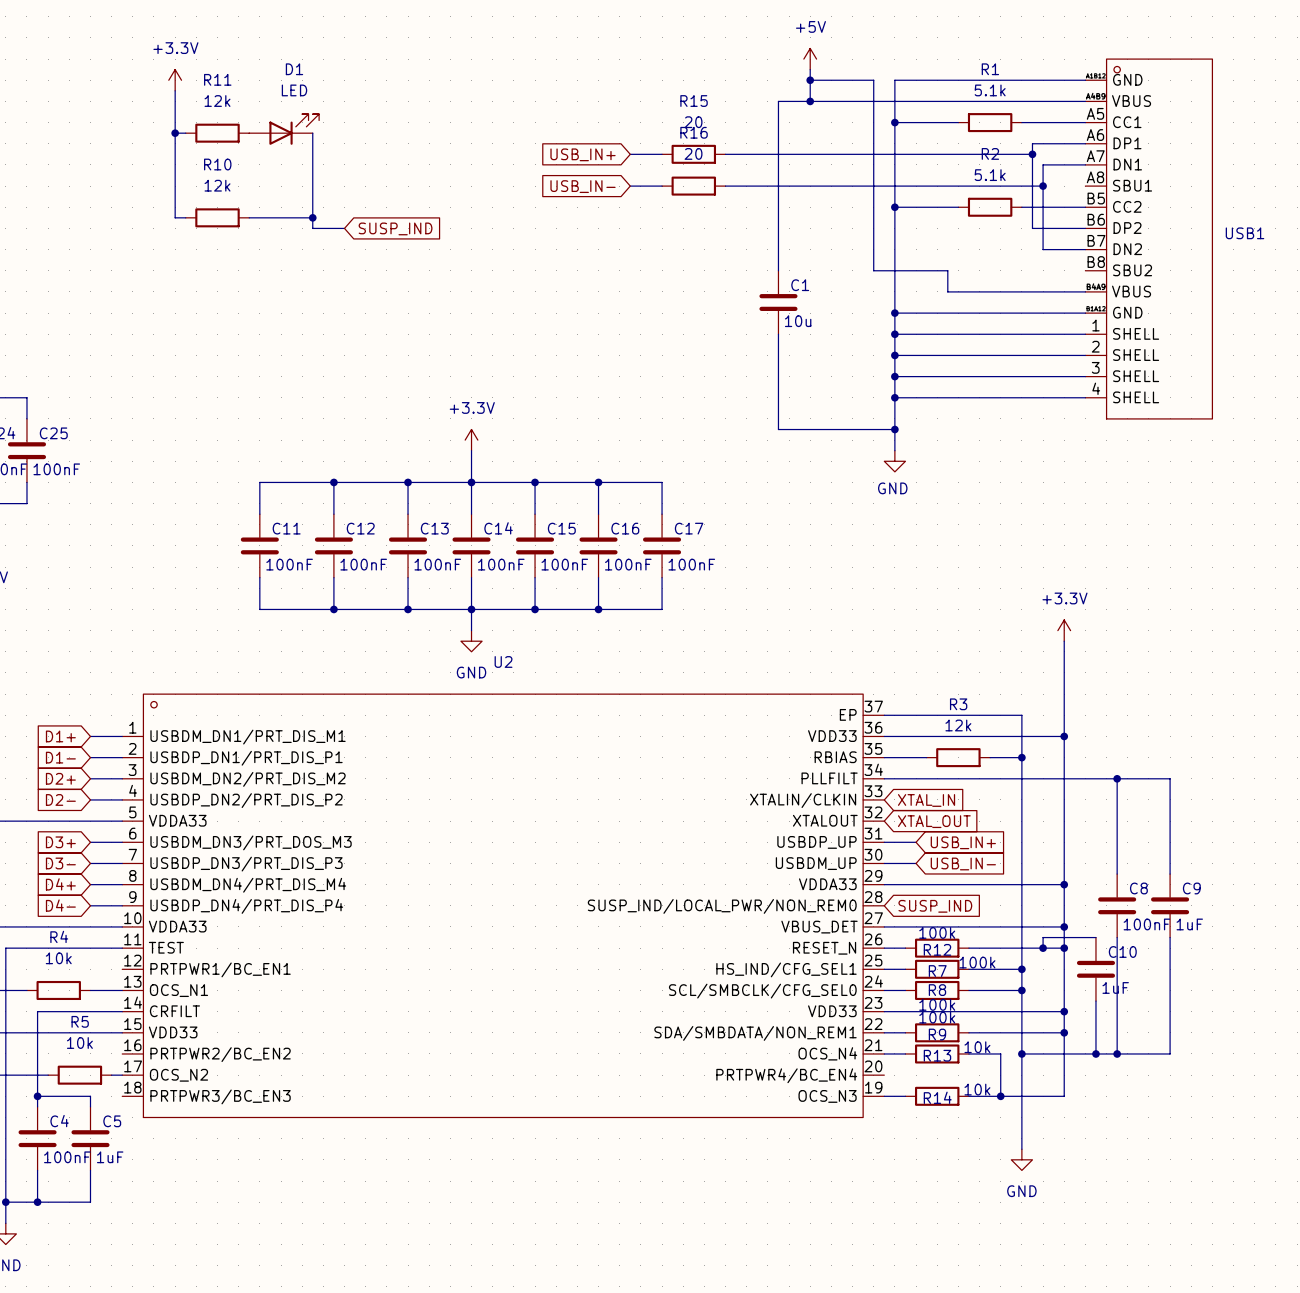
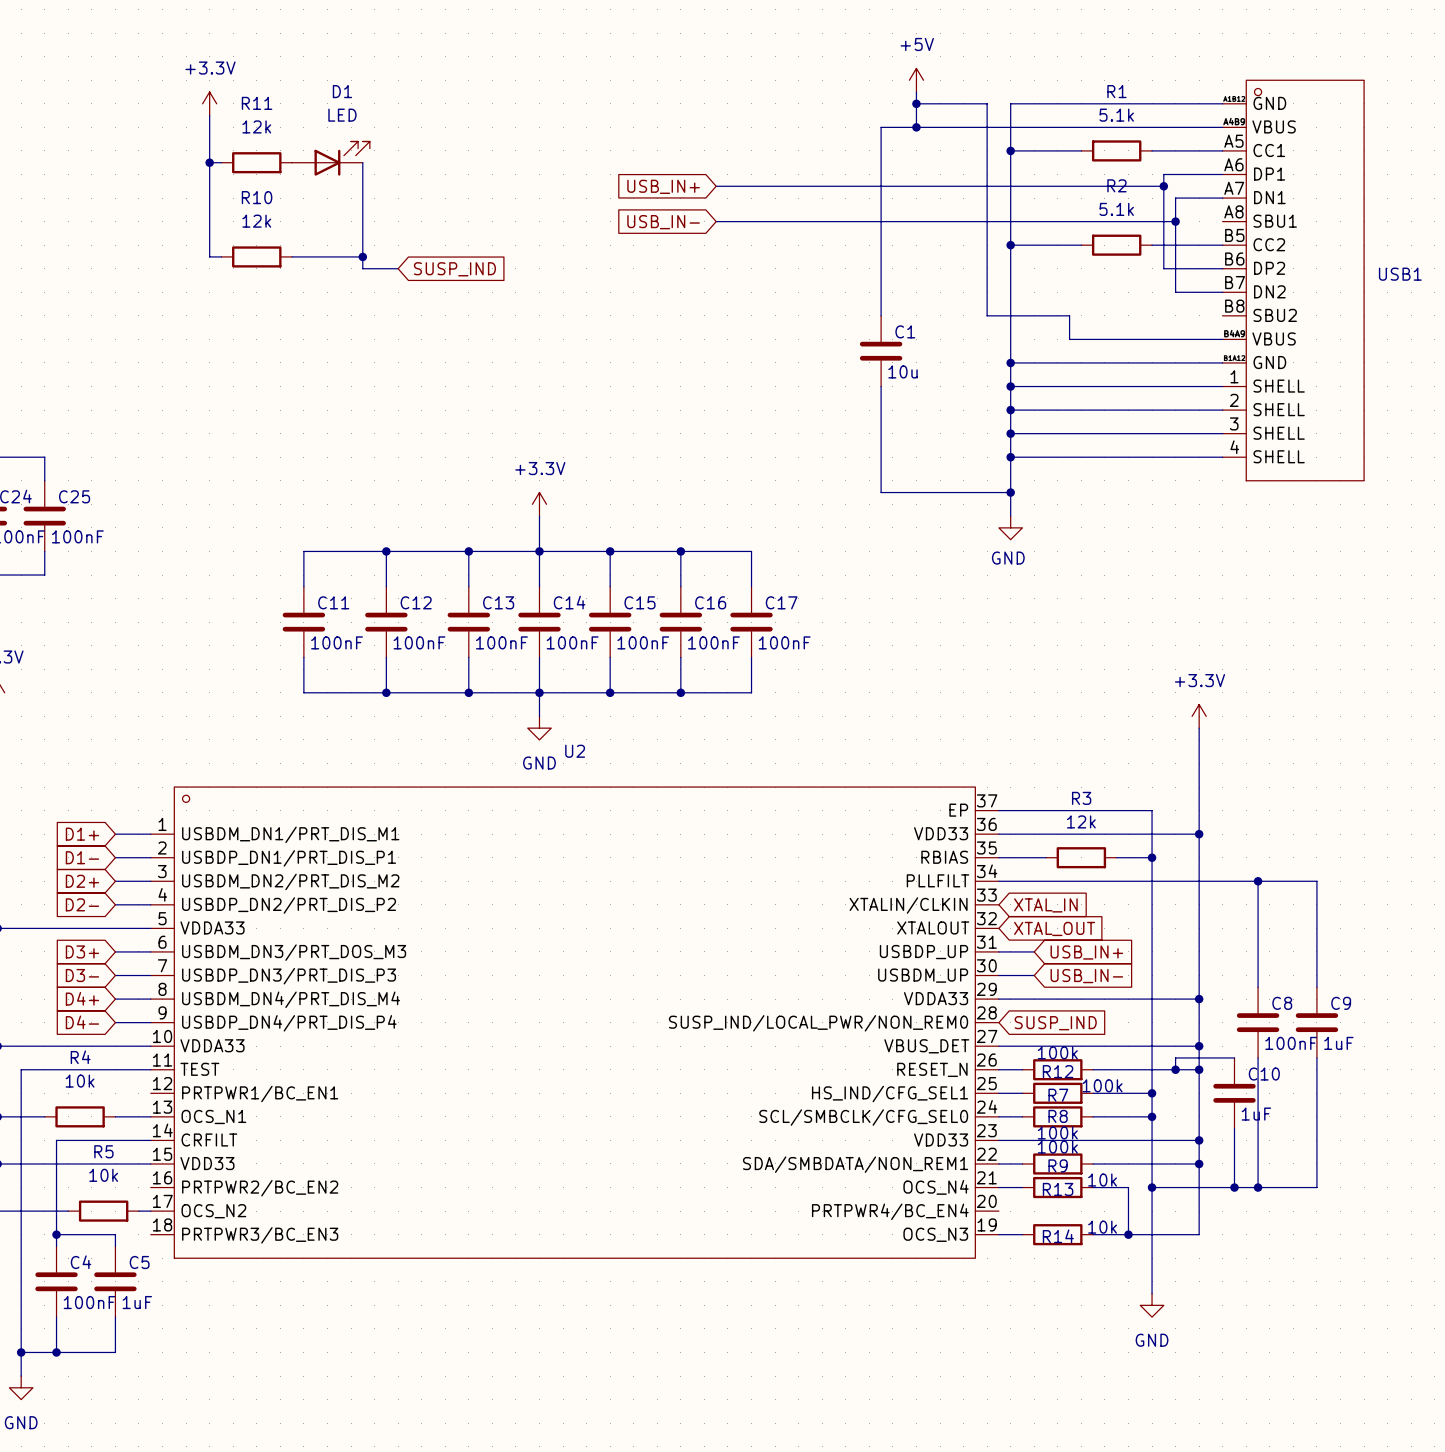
wire: none -> (751, 186) (822, 186)
R15: 20 (693, 154) -> none
wire: none -> (751, 221) (822, 221)
R16: 20 (693, 186) -> none

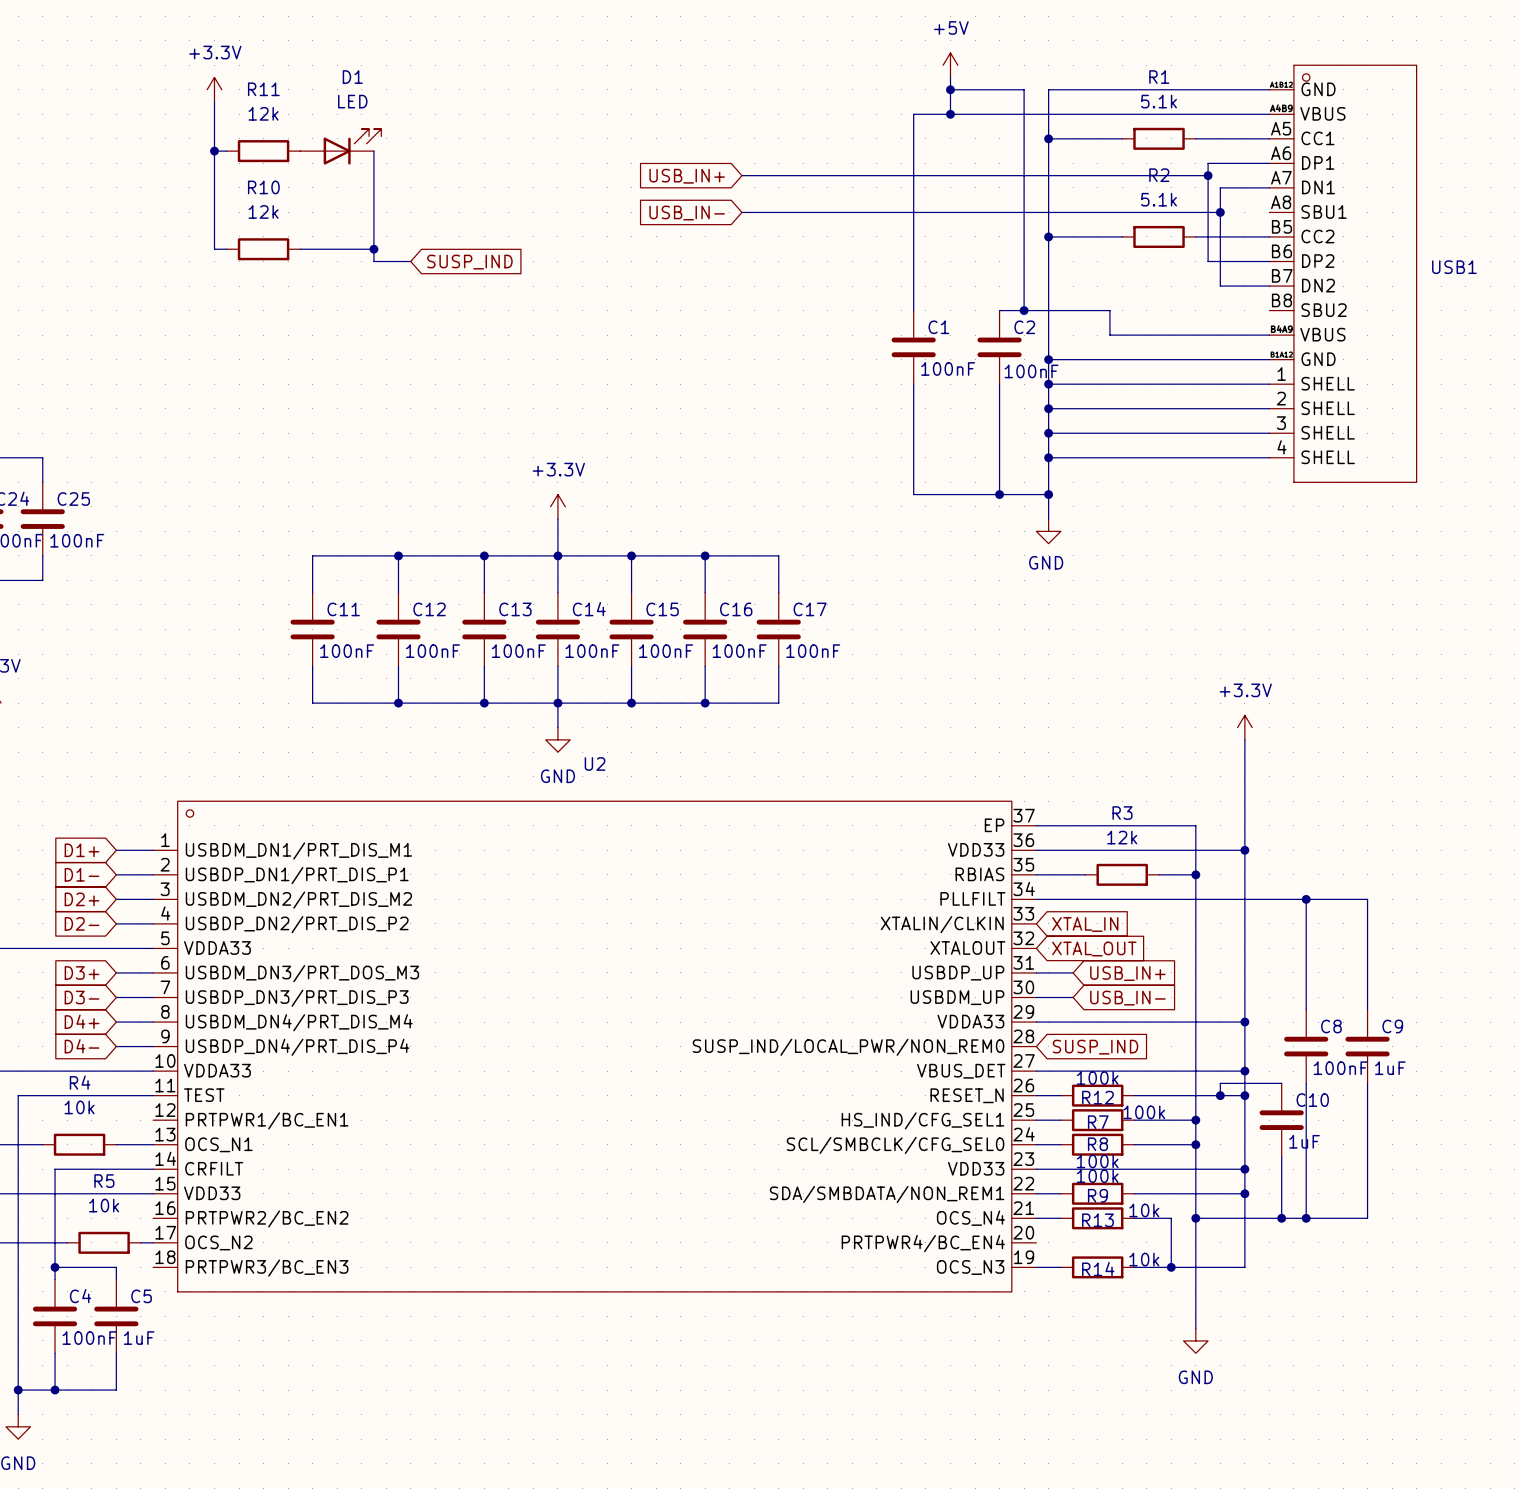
wire: none -> (999, 310) (1024, 310)
junction: none -> (1024, 310)
C2: none -> 100nF (999, 347)
C1 value: 10u (903, 371) -> 100nF (948, 369)
wire: none -> (999, 384) (999, 494)
junction: none -> (999, 494)

